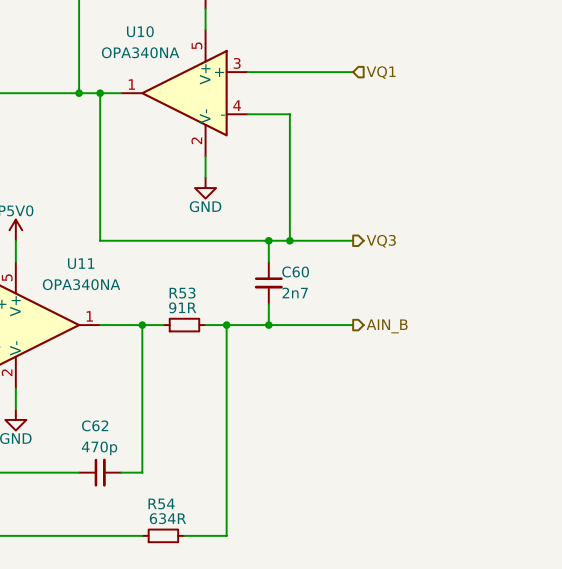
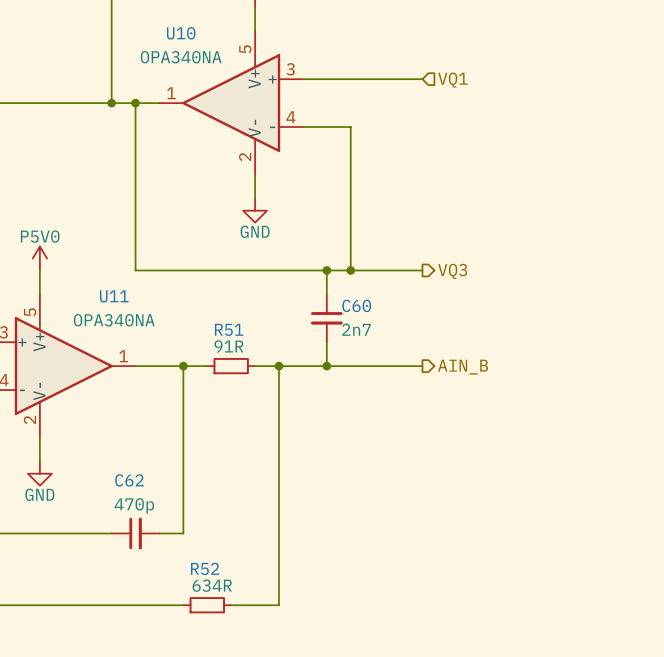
R53 name: R53 (182, 293) -> R51 (229, 329)
R54 name: R54 (161, 503) -> R52 (205, 568)

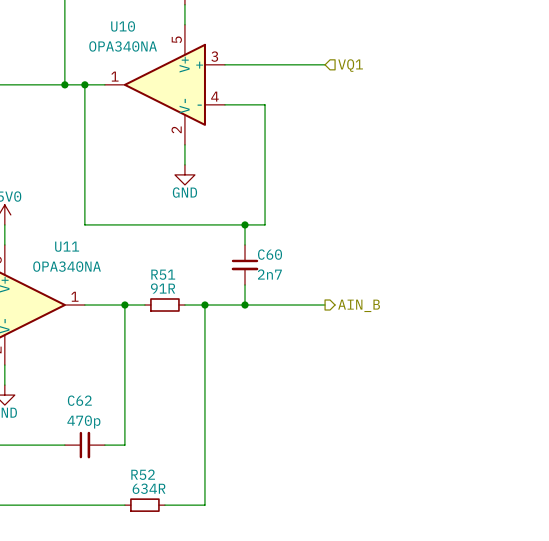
wire: (350, 270) (422, 270) -> none
junction: (350, 270) -> none
hierarchical label: VQ3 (452, 271) -> none

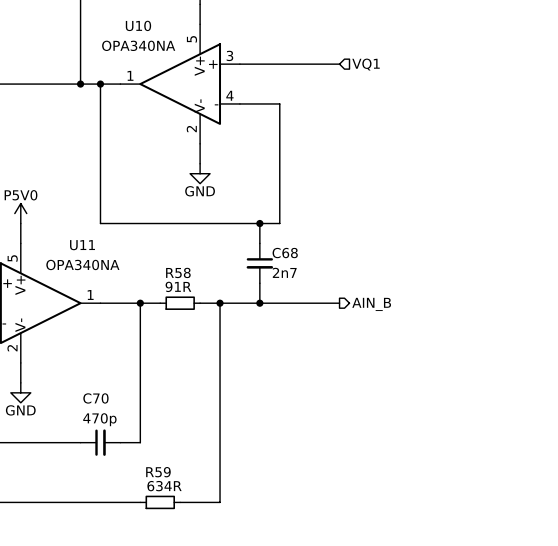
C60 name: C60 (270, 254) -> C68 (285, 253)
R51 name: R51 (163, 274) -> R58 (178, 272)
C62 name: C62 (79, 400) -> C70 (95, 398)
R52 name: R52 (143, 474) -> R59 (158, 472)

